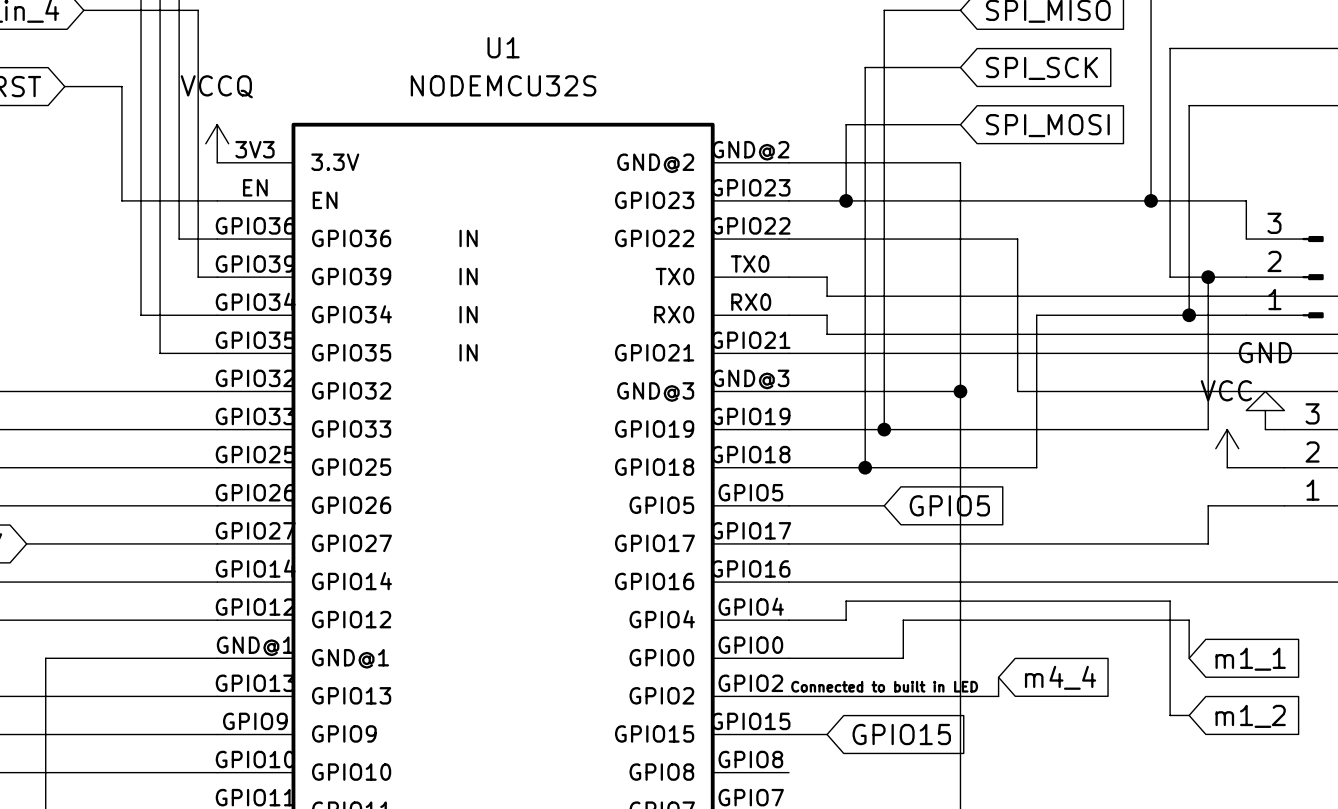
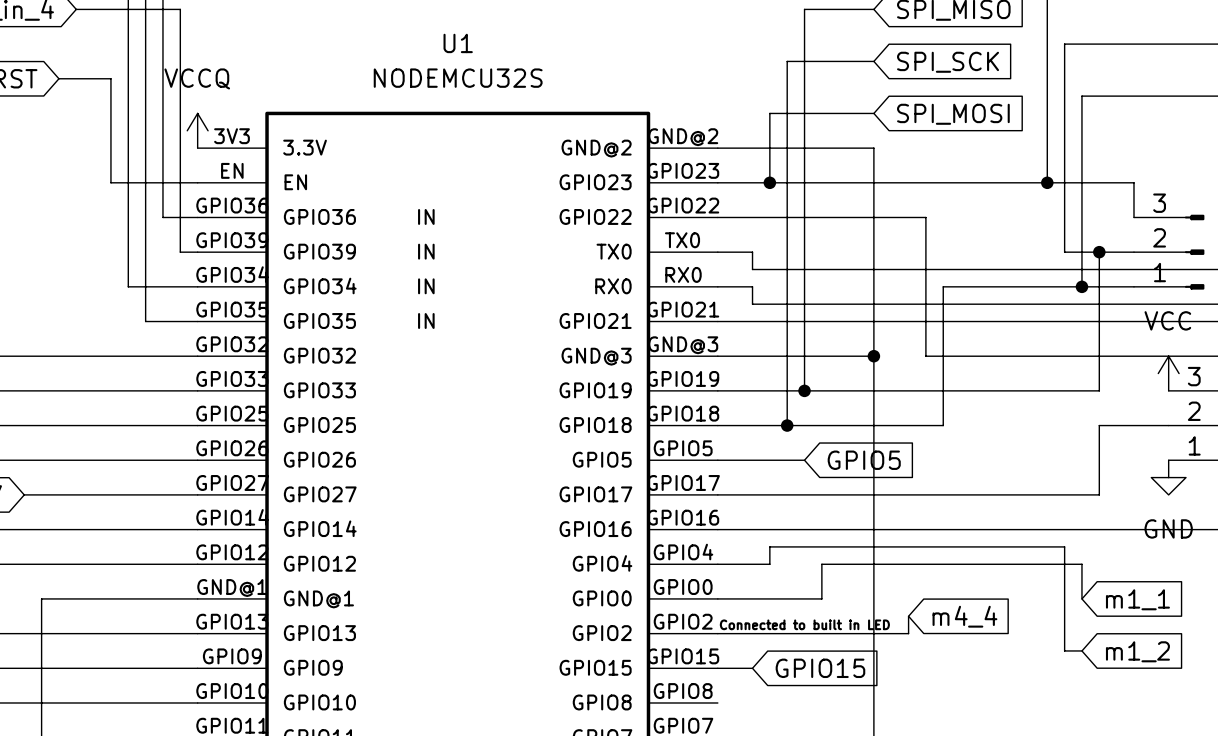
power symbol rotation: 0° (1265, 410) -> 180° (1168, 477)
power symbol position: GND (1265, 410) -> GND (1168, 477)
wire: (1265, 429) (1284, 429) -> none
power symbol position: VCC (1227, 448) -> VCC (1168, 373)
wire: (1208, 505) (1284, 505) -> (1099, 460) (1099, 425) (1116, 425)

